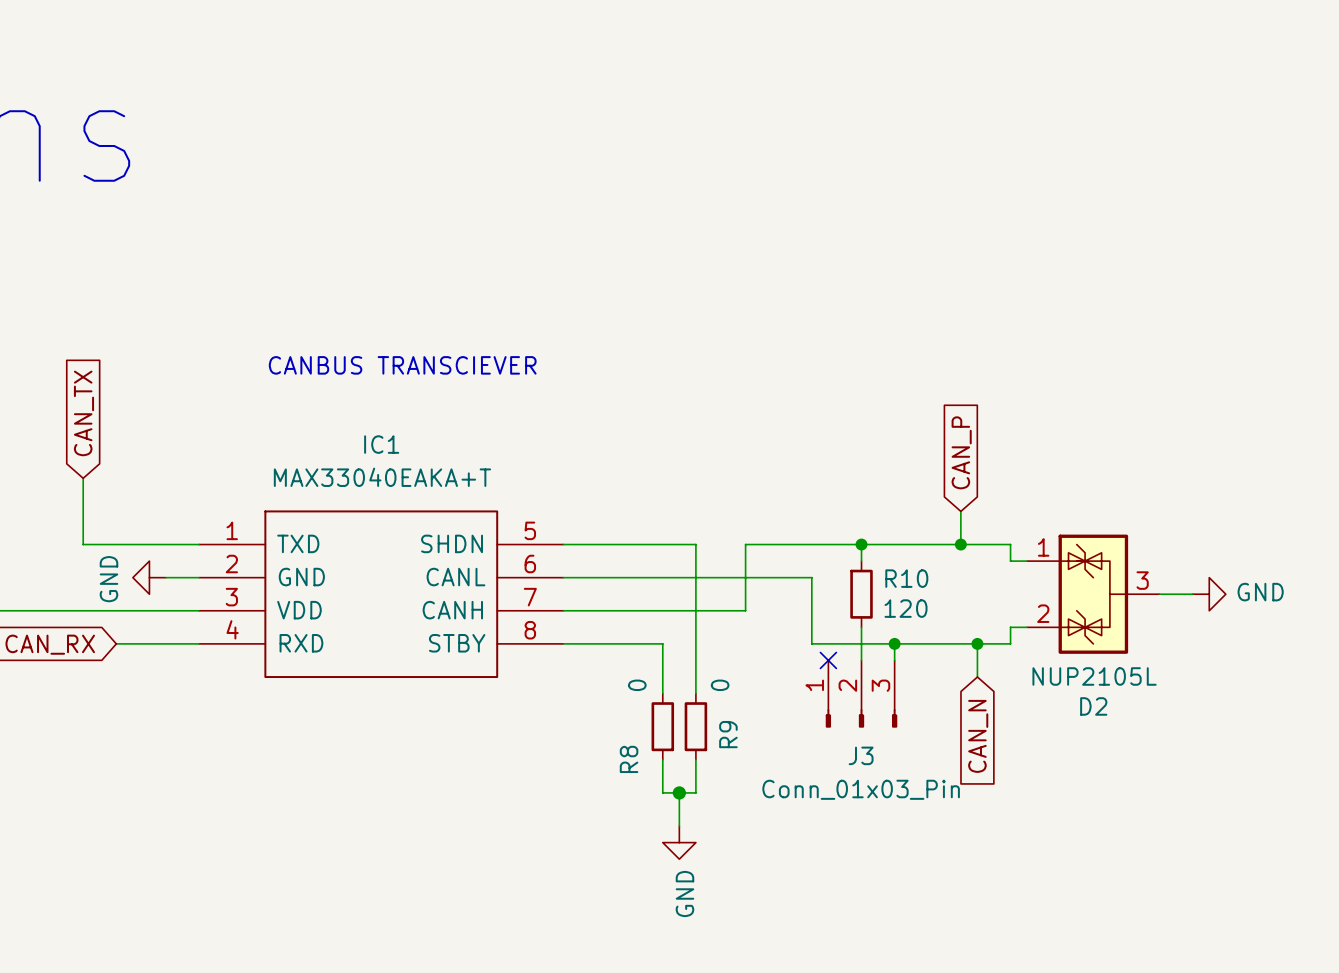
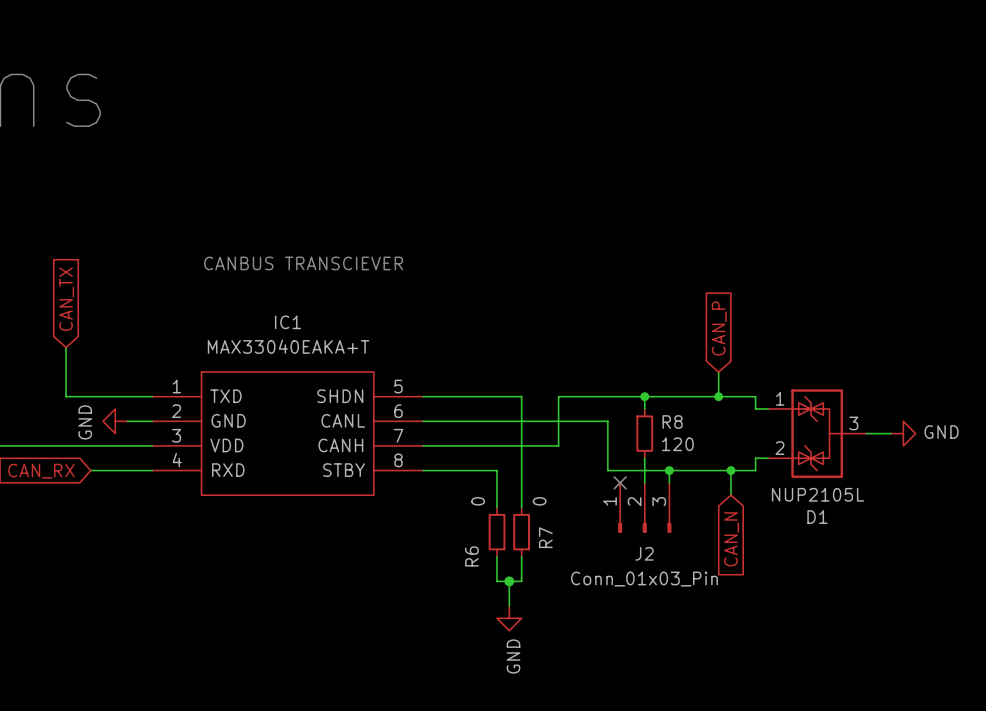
R10 name: R10 (906, 578) -> R8 (672, 422)
D2 name: D2 (1093, 706) -> D1 (817, 517)
R9 name: R9 (728, 734) -> R7 (545, 537)
J3 name: J3 (861, 755) -> J2 (644, 553)
R8 name: R8 (629, 759) -> R6 (471, 556)

